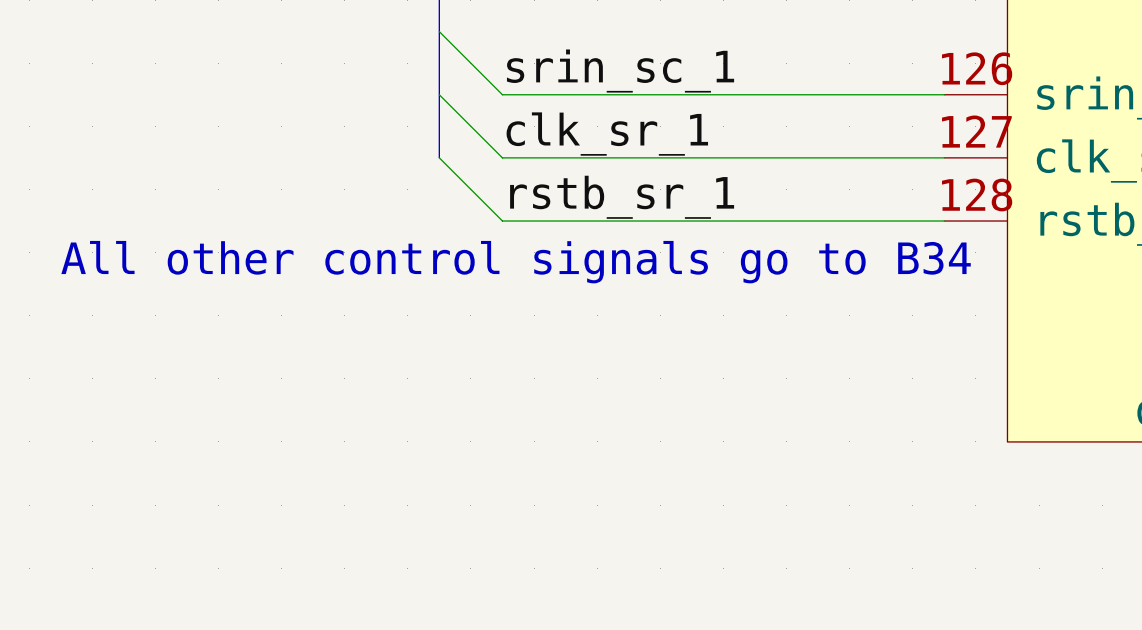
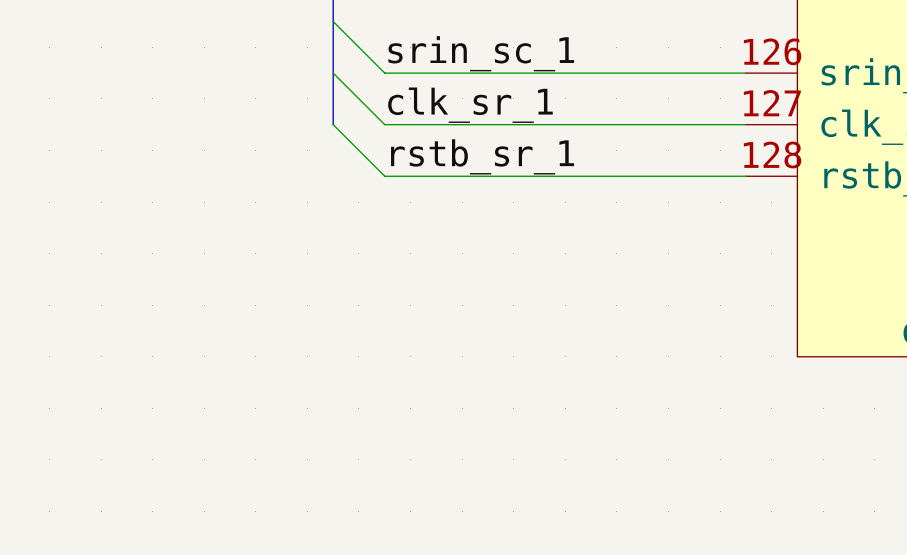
text: All other control signals go to B34 (516, 262) -> none

